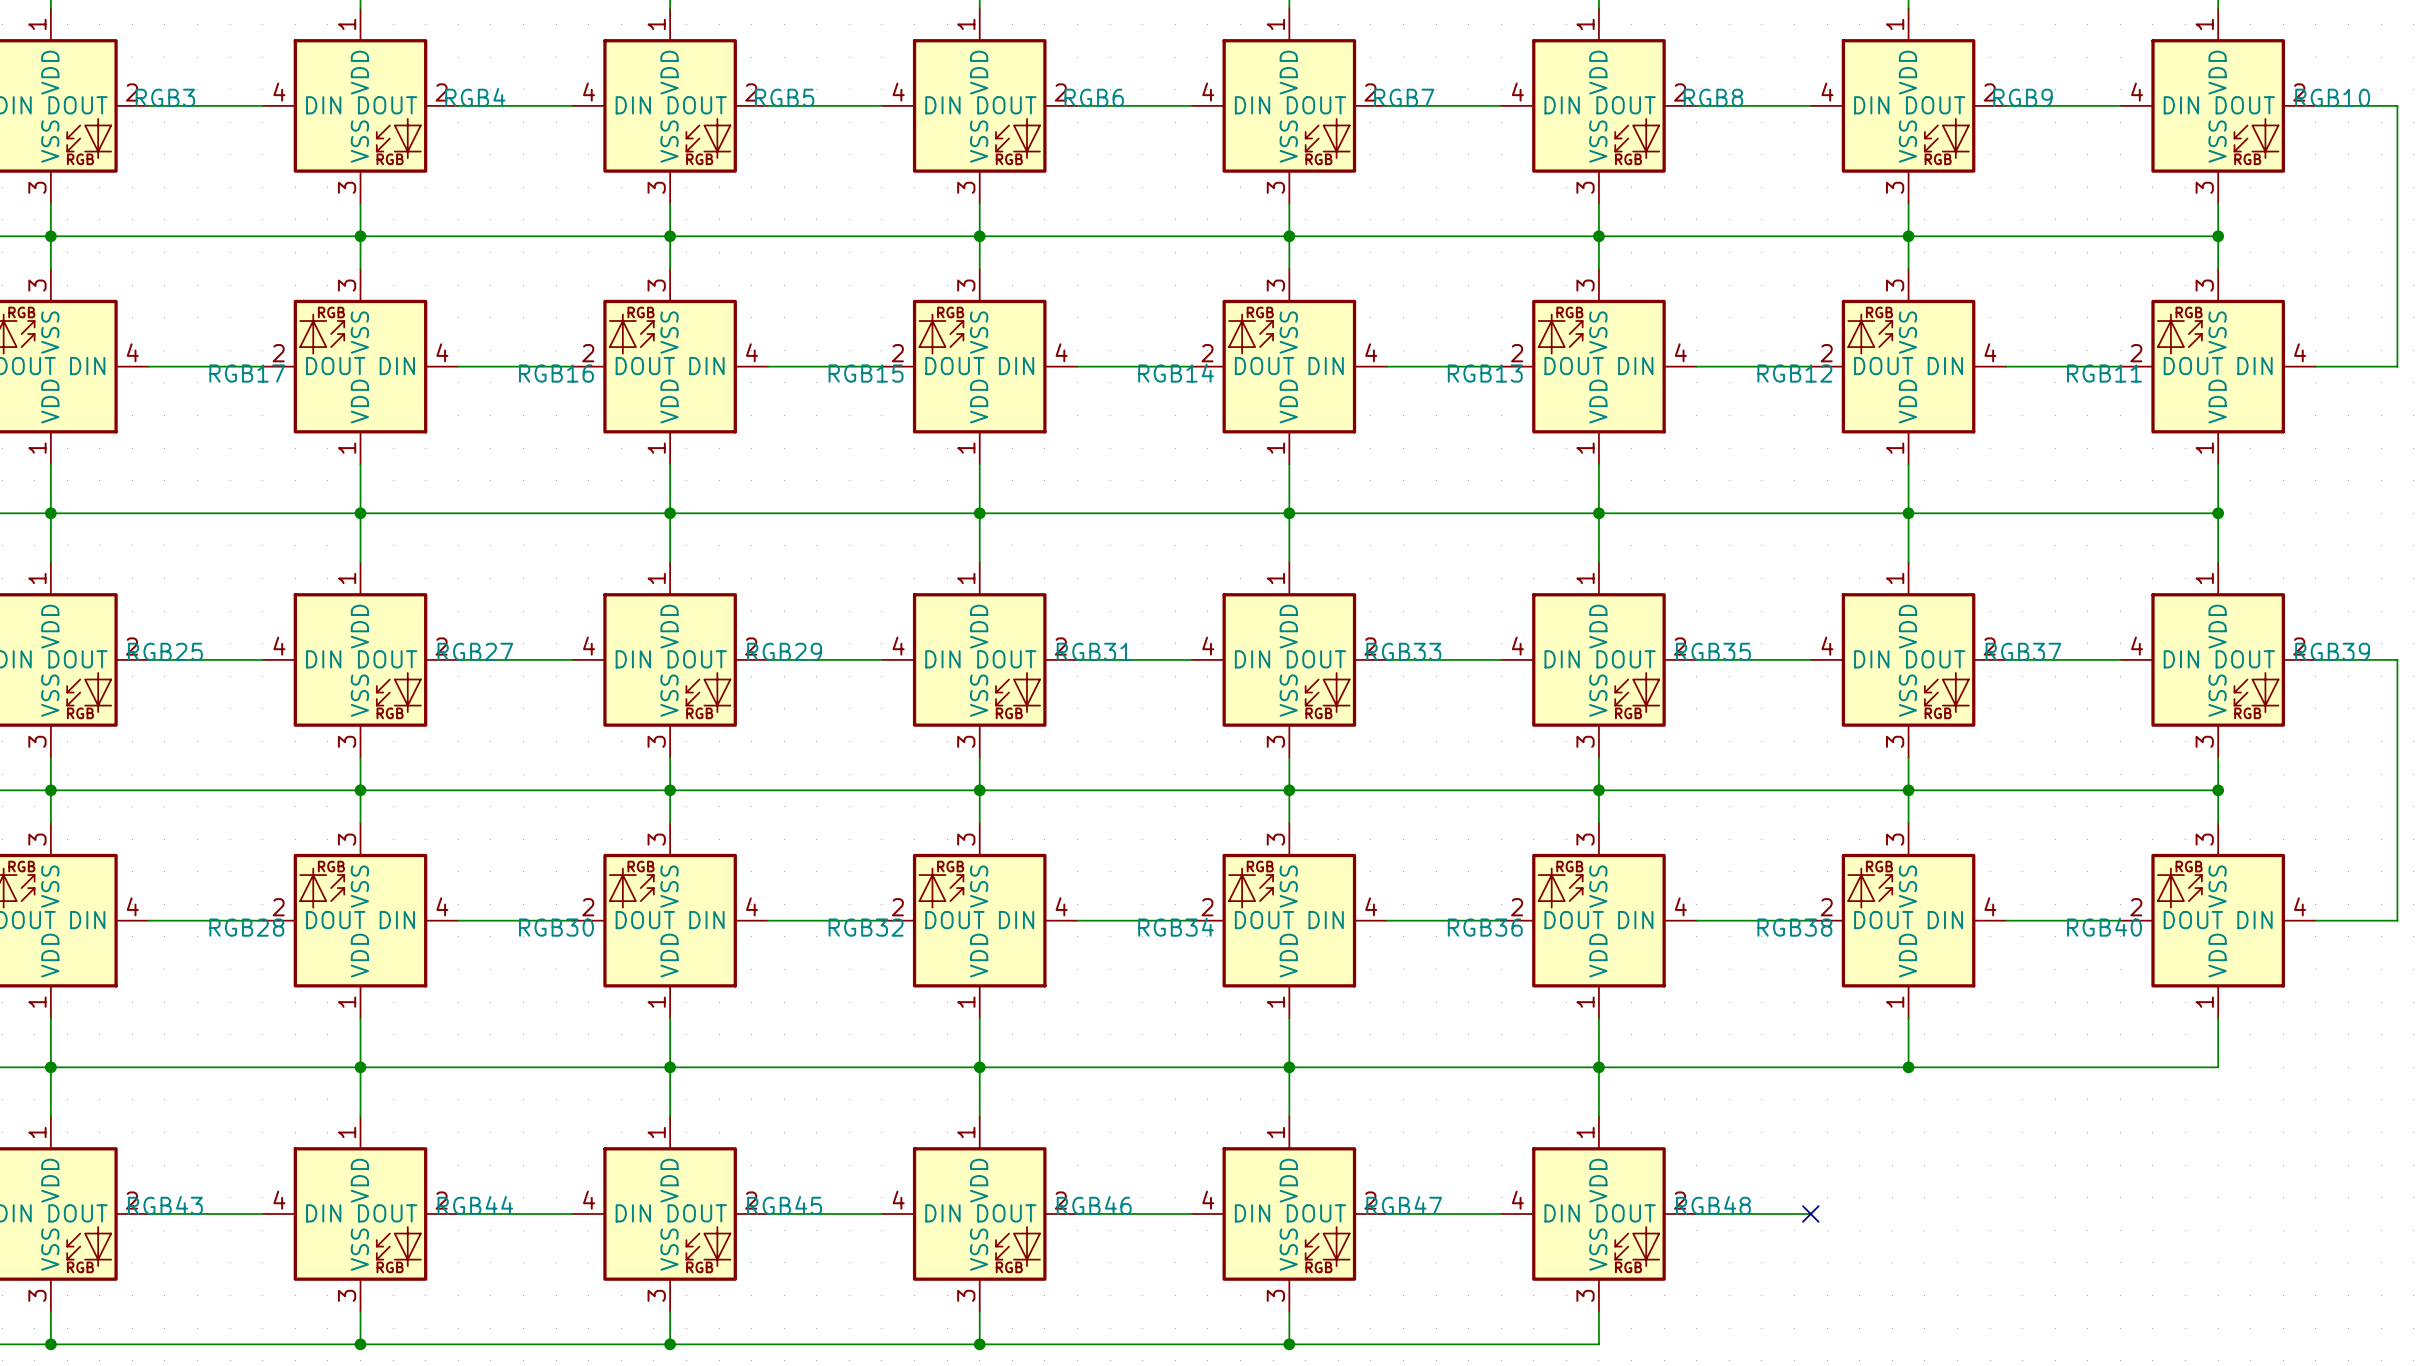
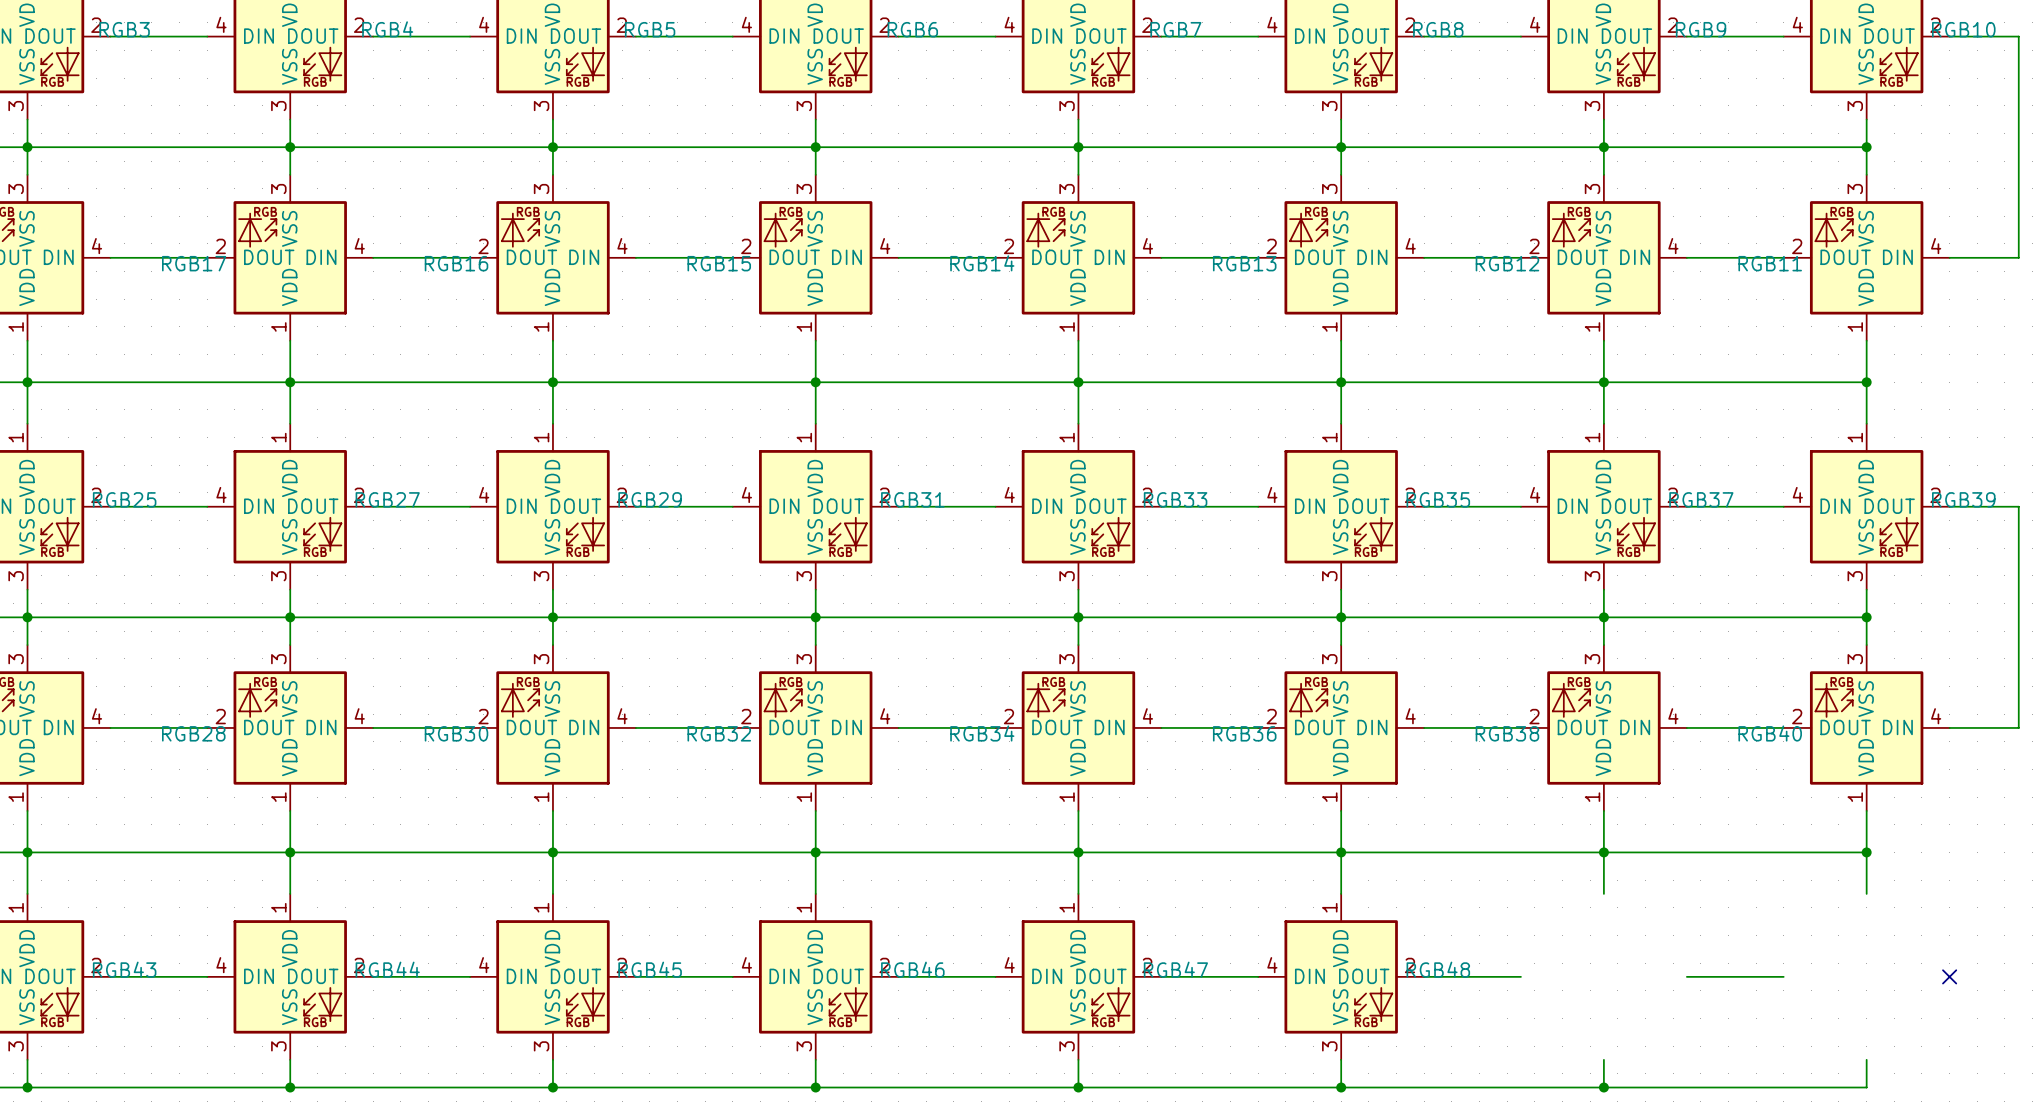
wire: none -> (1603, 852) (1603, 893)
wire: none -> (1866, 852) (1866, 893)
junction: none -> (1866, 852)
no-connect mark: (1810, 1213) -> none
wire: none -> (1686, 976) (1783, 976)
no-connect mark: none -> (1949, 976)
wire: none -> (1603, 1059) (1603, 1087)
wire: none -> (1866, 1059) (1866, 1087) (1341, 1087)
junction: none -> (1341, 1087)
junction: none -> (1603, 1087)

